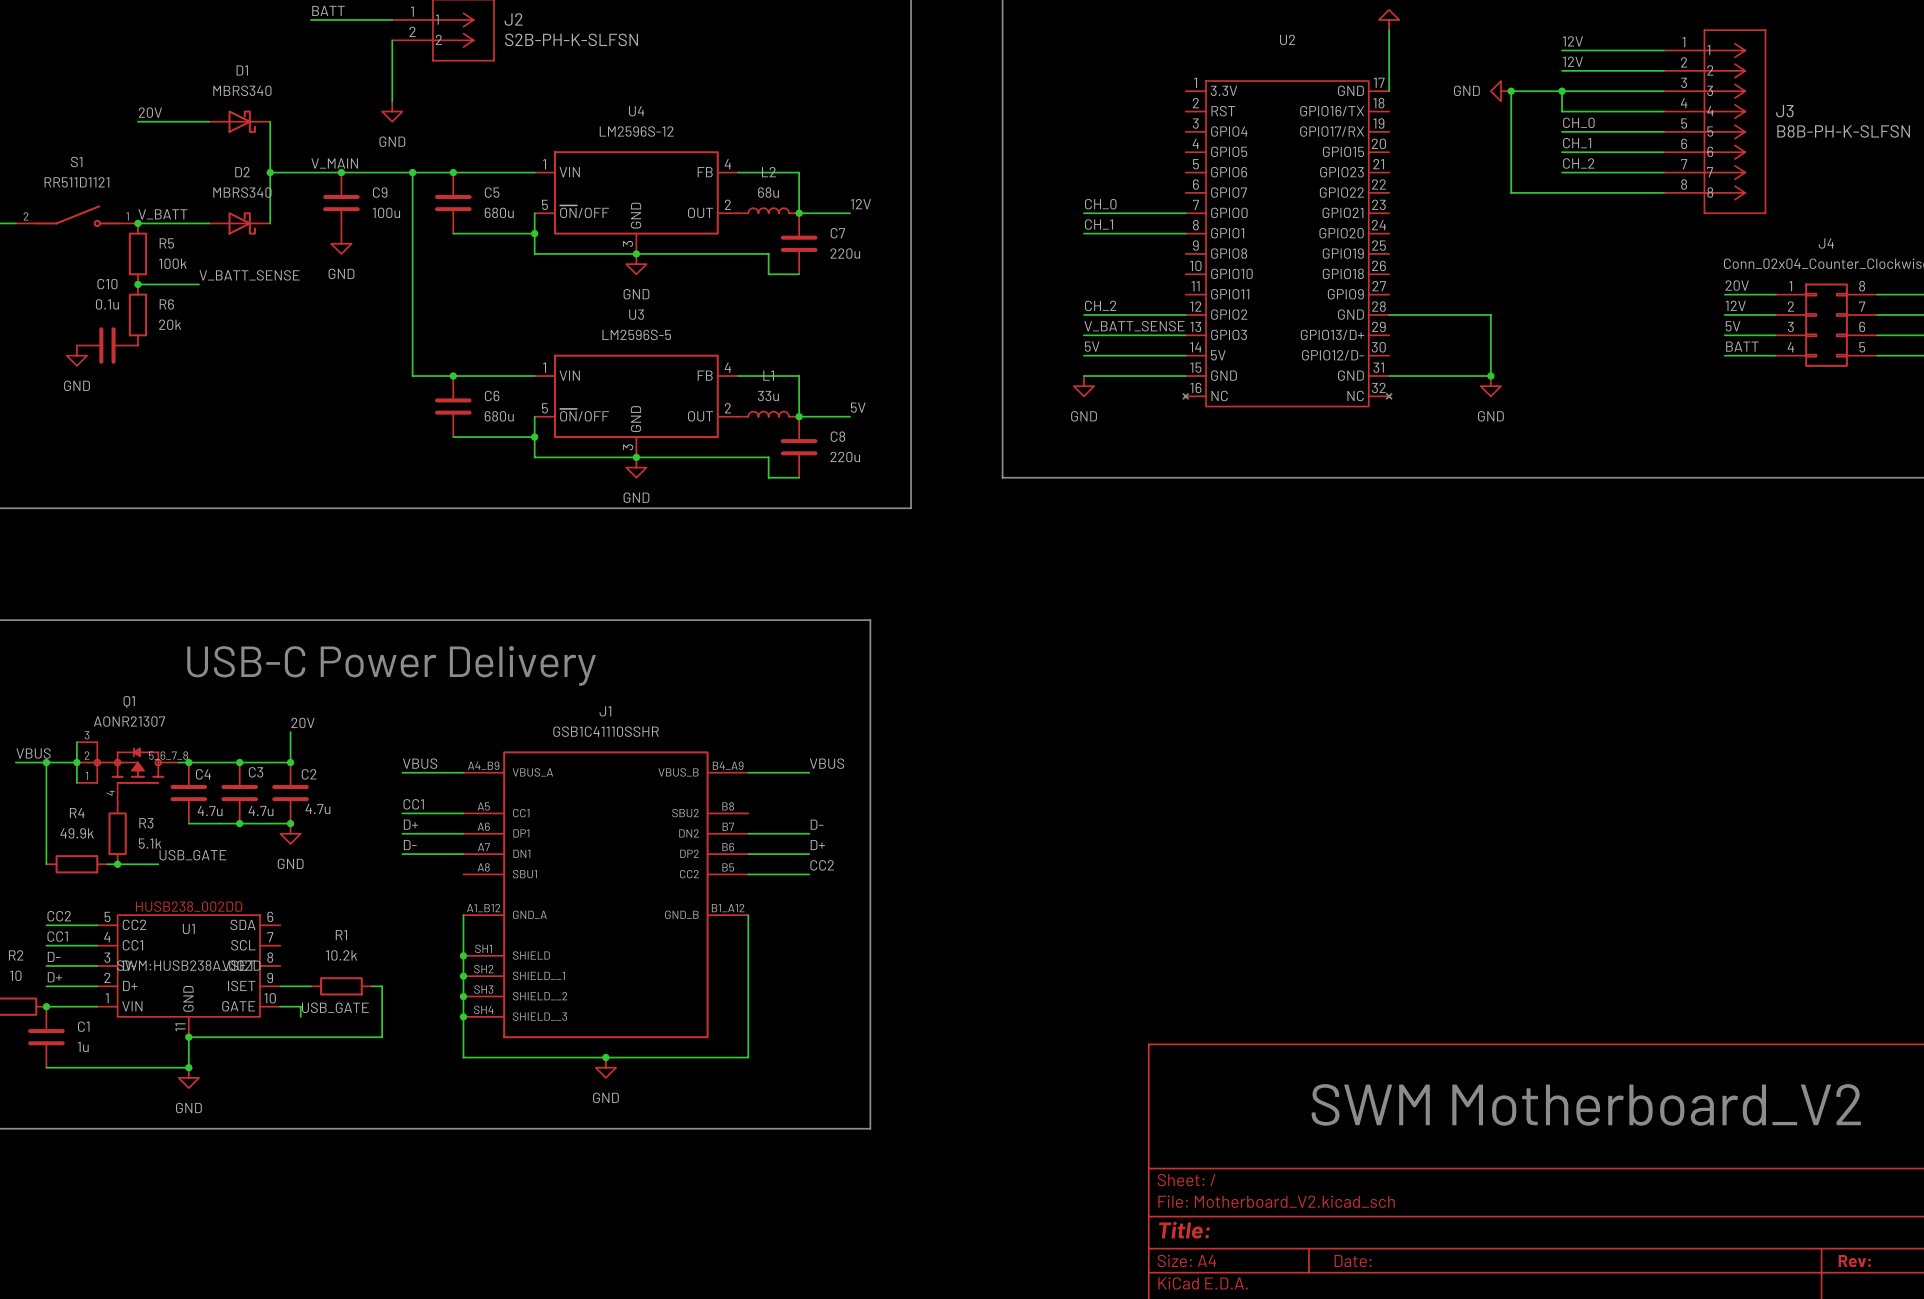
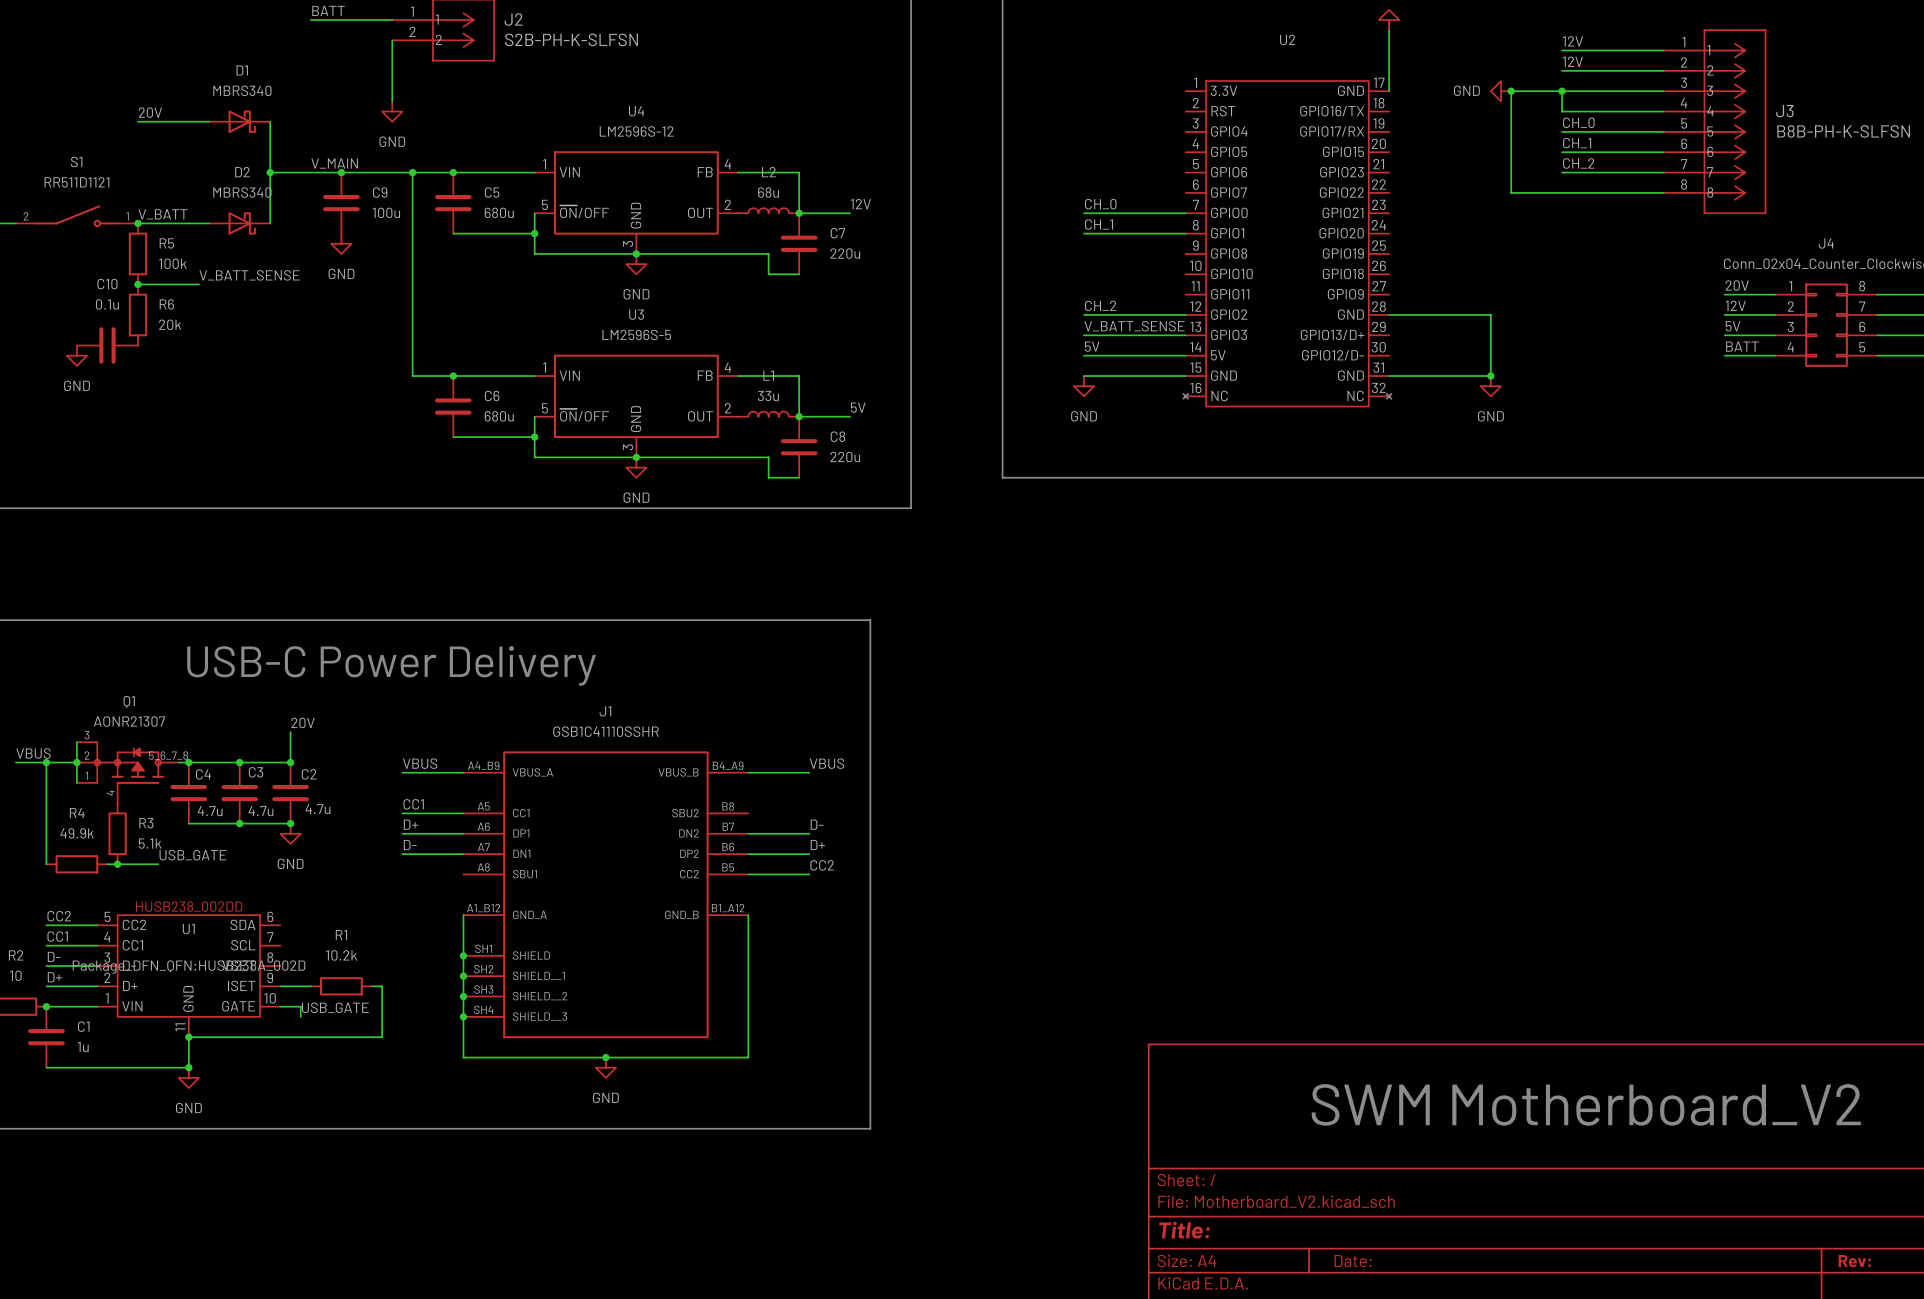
U1 text: SWM:HUSB238A_002D (188, 965) -> Package_DFN_QFN:HUSB238A_002D (189, 966)

